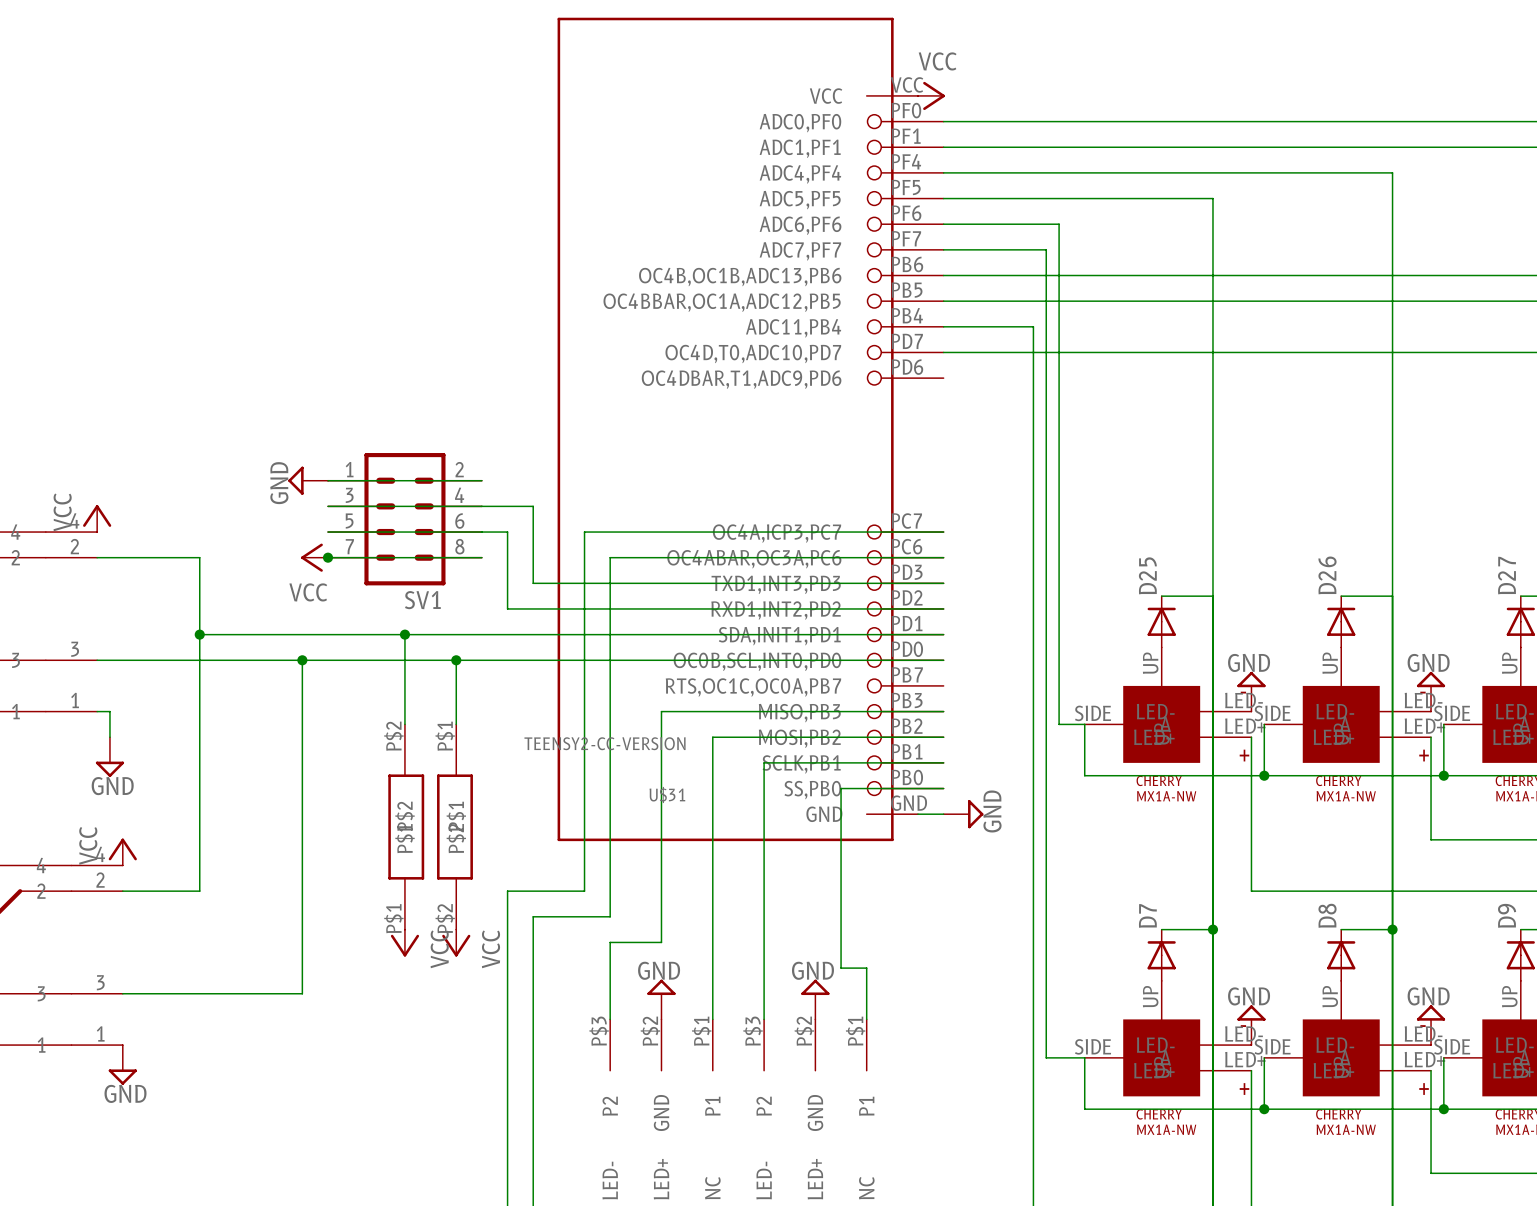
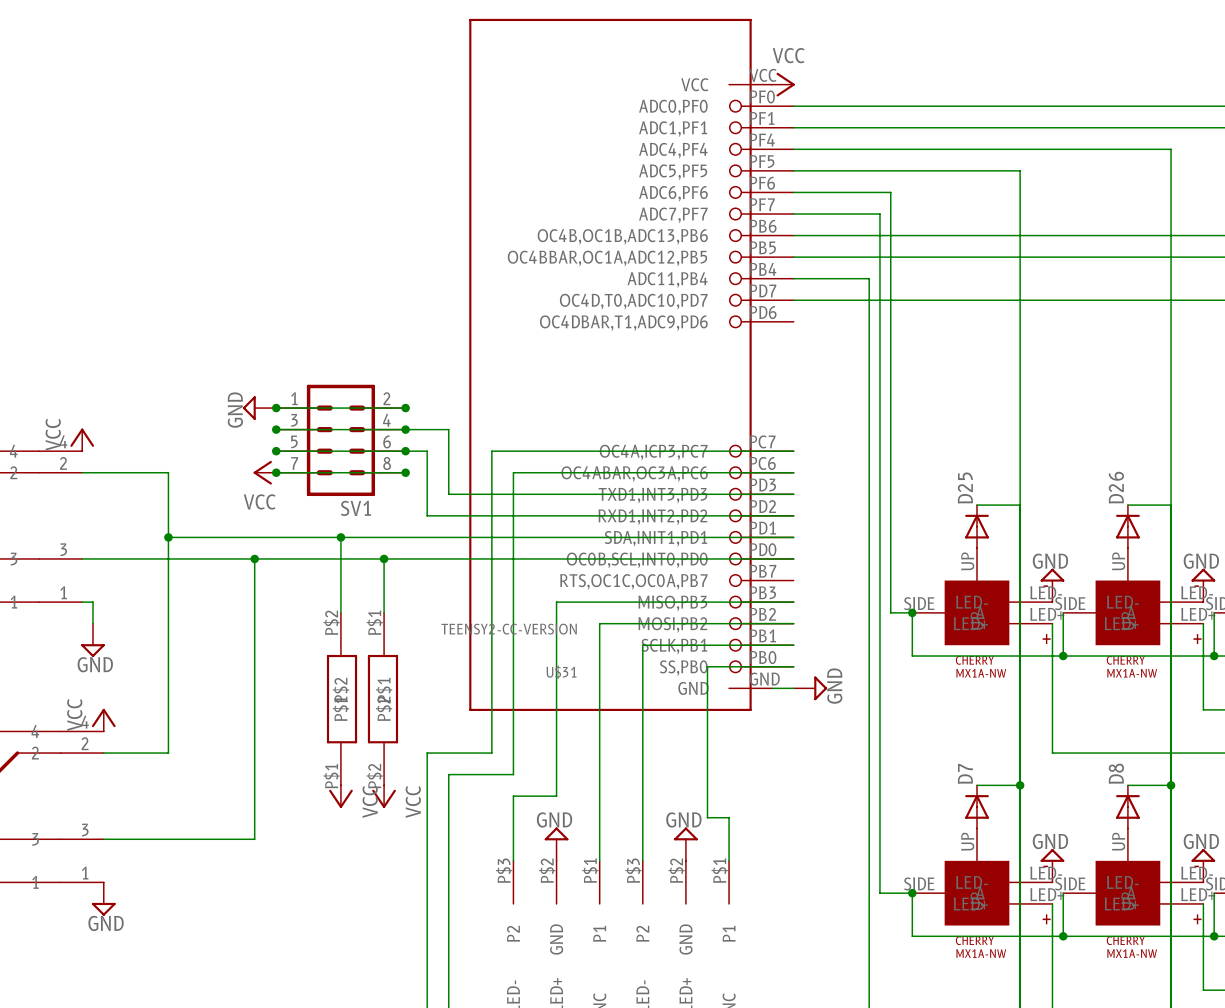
junction: none -> (276, 408)
junction: none -> (405, 408)
junction: none -> (276, 429)
junction: none -> (405, 429)
junction: none -> (276, 451)
junction: none -> (405, 451)
junction: none -> (405, 472)
junction: none -> (912, 612)
junction: none -> (912, 893)

